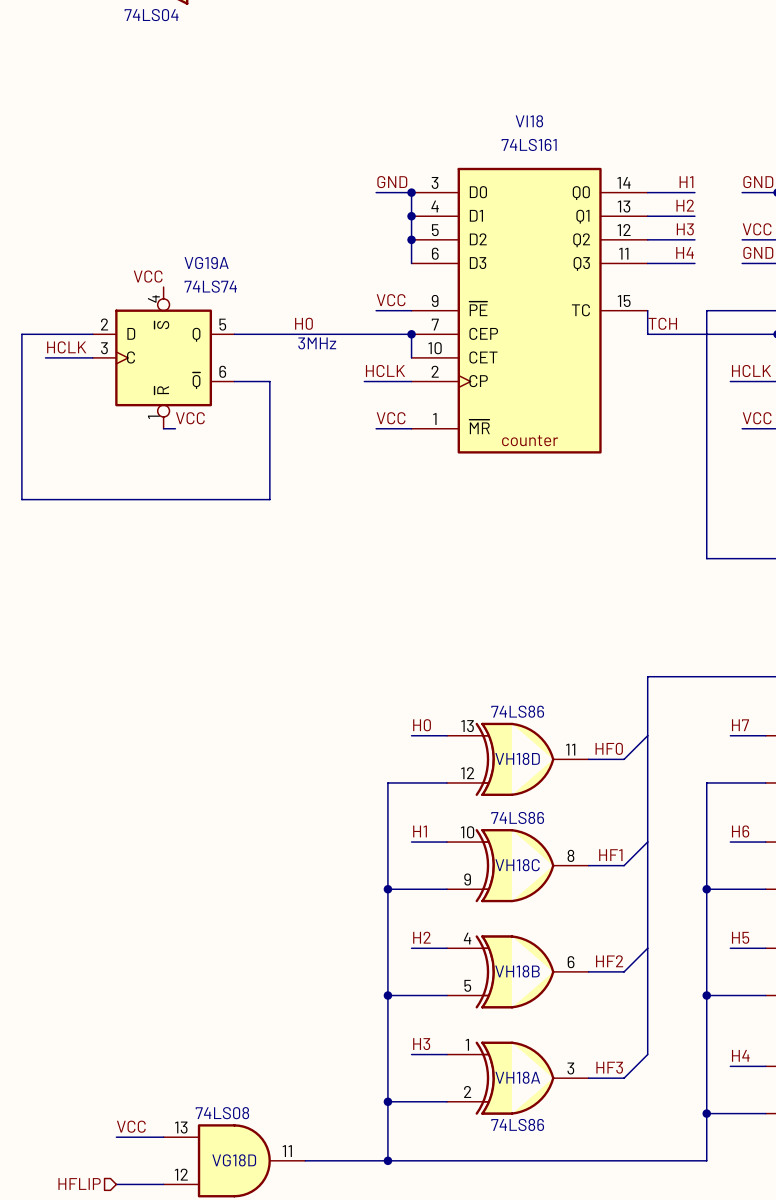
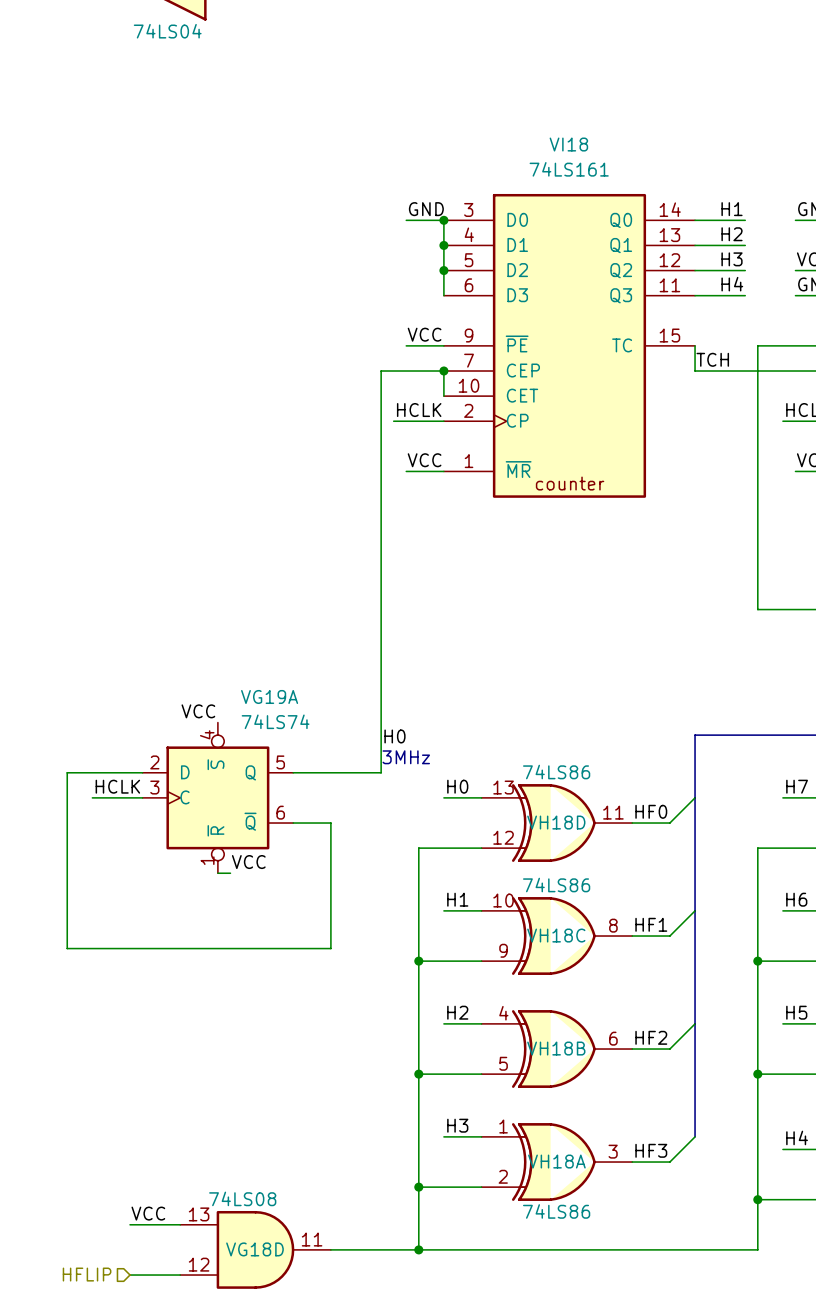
label: VCC (148, 276) -> none
label: H0 (303, 323) -> none
wire: (92, 334) (21, 334) (21, 499) (269, 499) (269, 381) (234, 381) -> none
wire: (234, 334) (352, 334) -> (293, 772) (381, 772) (381, 371)
text: 3MHz (317, 343) -> none
label: HCLK (66, 347) -> none
wire: (45, 357) (92, 357) -> none
VG19A position: (163, 357) -> (217, 797)
label: VCC (190, 418) -> none
wire: (163, 428) (175, 428) -> none
label: none -> VCC (198, 711)
label: none -> H0 (394, 736)
text: none -> 3MHz (406, 757)
wire: none -> (142, 772) (67, 772) (67, 948) (330, 948) (330, 823) (293, 823)
label: none -> HCLK (117, 786)
wire: none -> (92, 797) (142, 797)
label: none -> VCC (248, 862)
wire: none -> (217, 873) (230, 873)

